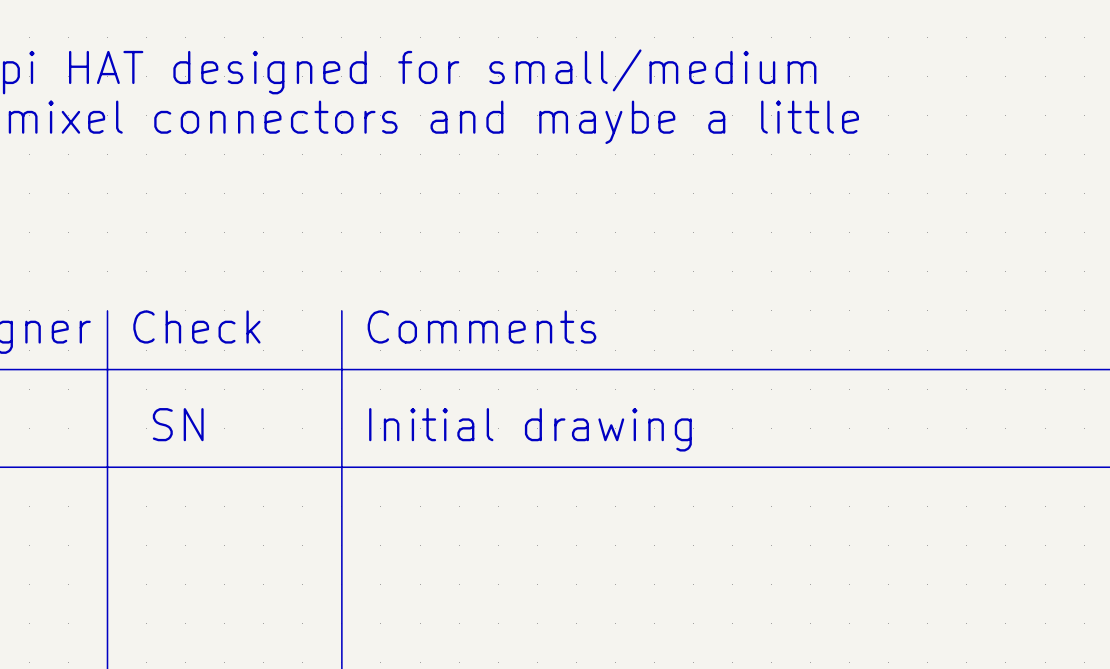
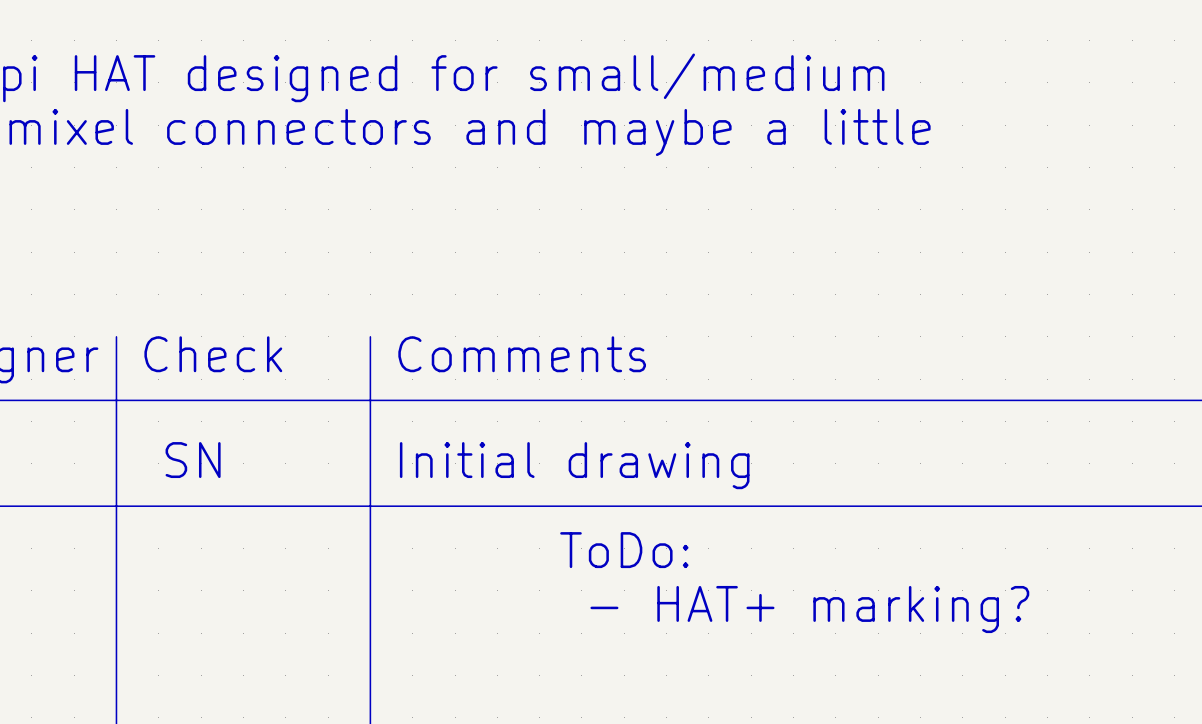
text: none -> ToDo: (624, 550)
text: none -> - HAT+ marking? (809, 609)

